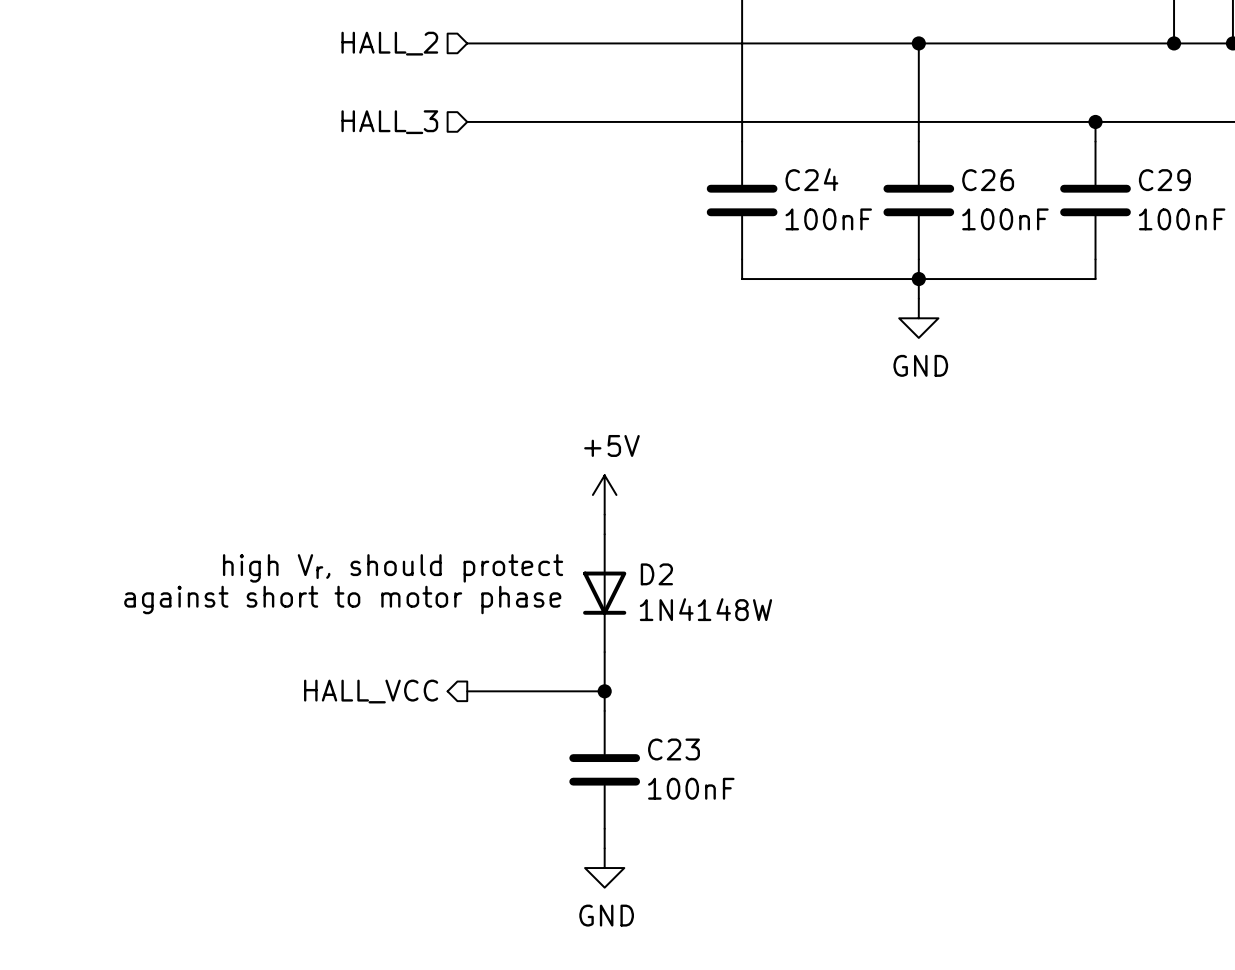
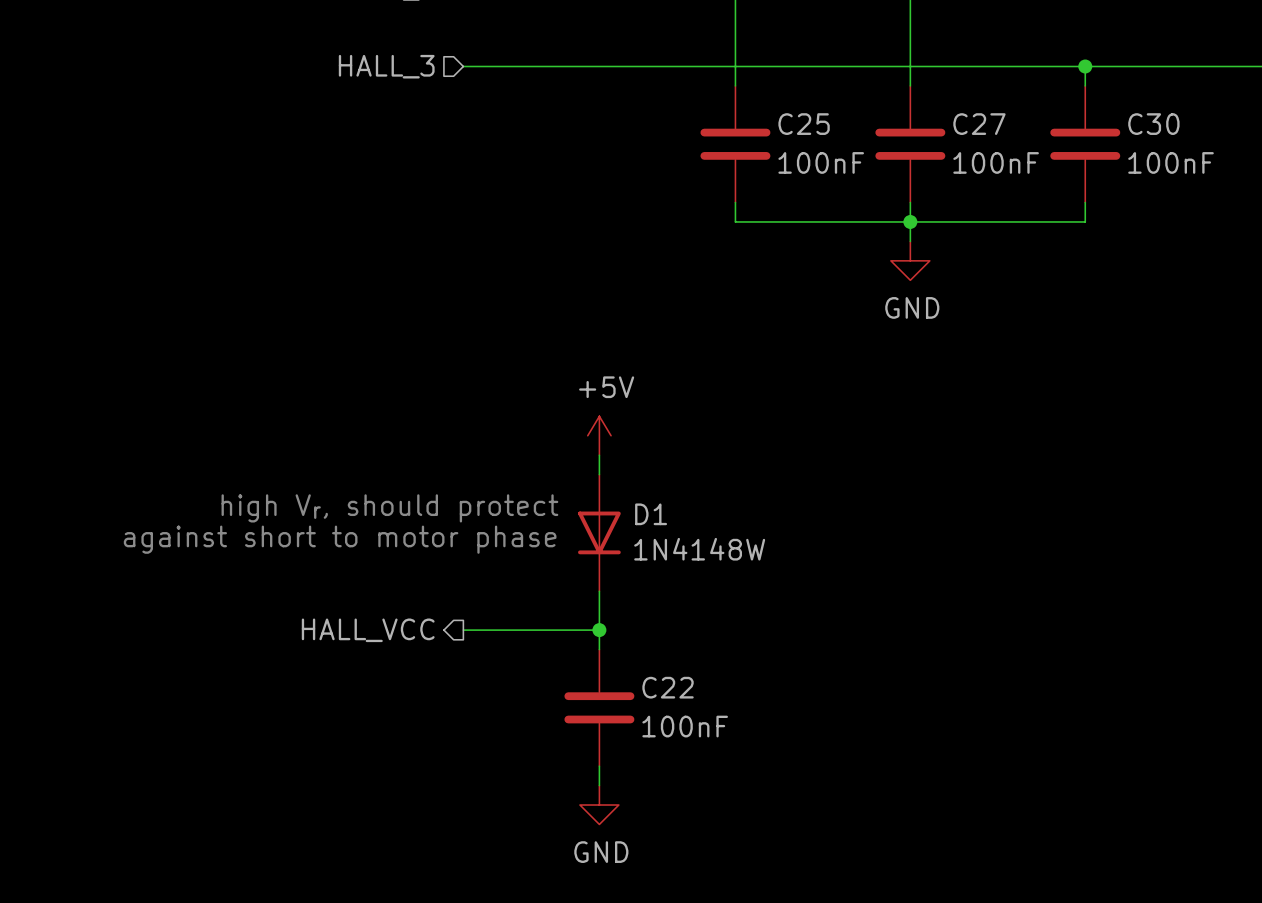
C24 name: C24 (811, 179) -> C25 (804, 124)
C26 name: C26 (988, 180) -> C27 (979, 124)
C29 name: C29 (1164, 180) -> C30 (1153, 124)
D2 name: D2 (656, 574) -> D1 (651, 514)
C23 name: C23 (674, 749) -> C22 (668, 687)

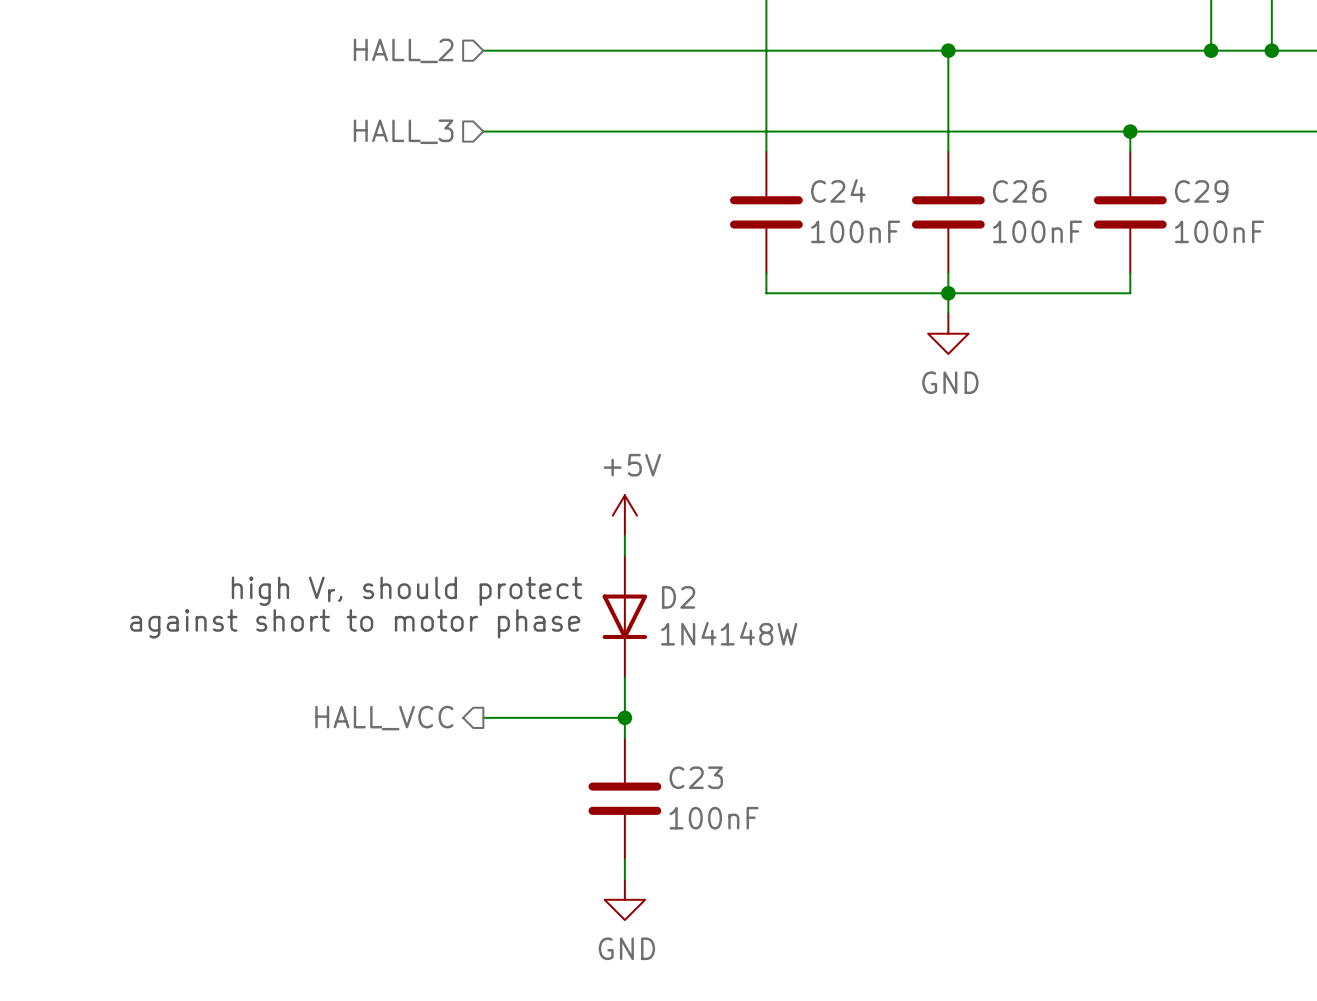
C25 name: C25 (804, 124) -> C24 (838, 190)
C27 name: C27 (979, 124) -> C26 (1019, 191)
C30 name: C30 (1153, 124) -> C29 (1201, 191)
D1 name: D1 (651, 514) -> D2 (678, 597)
C22 name: C22 (668, 687) -> C23 (696, 777)

